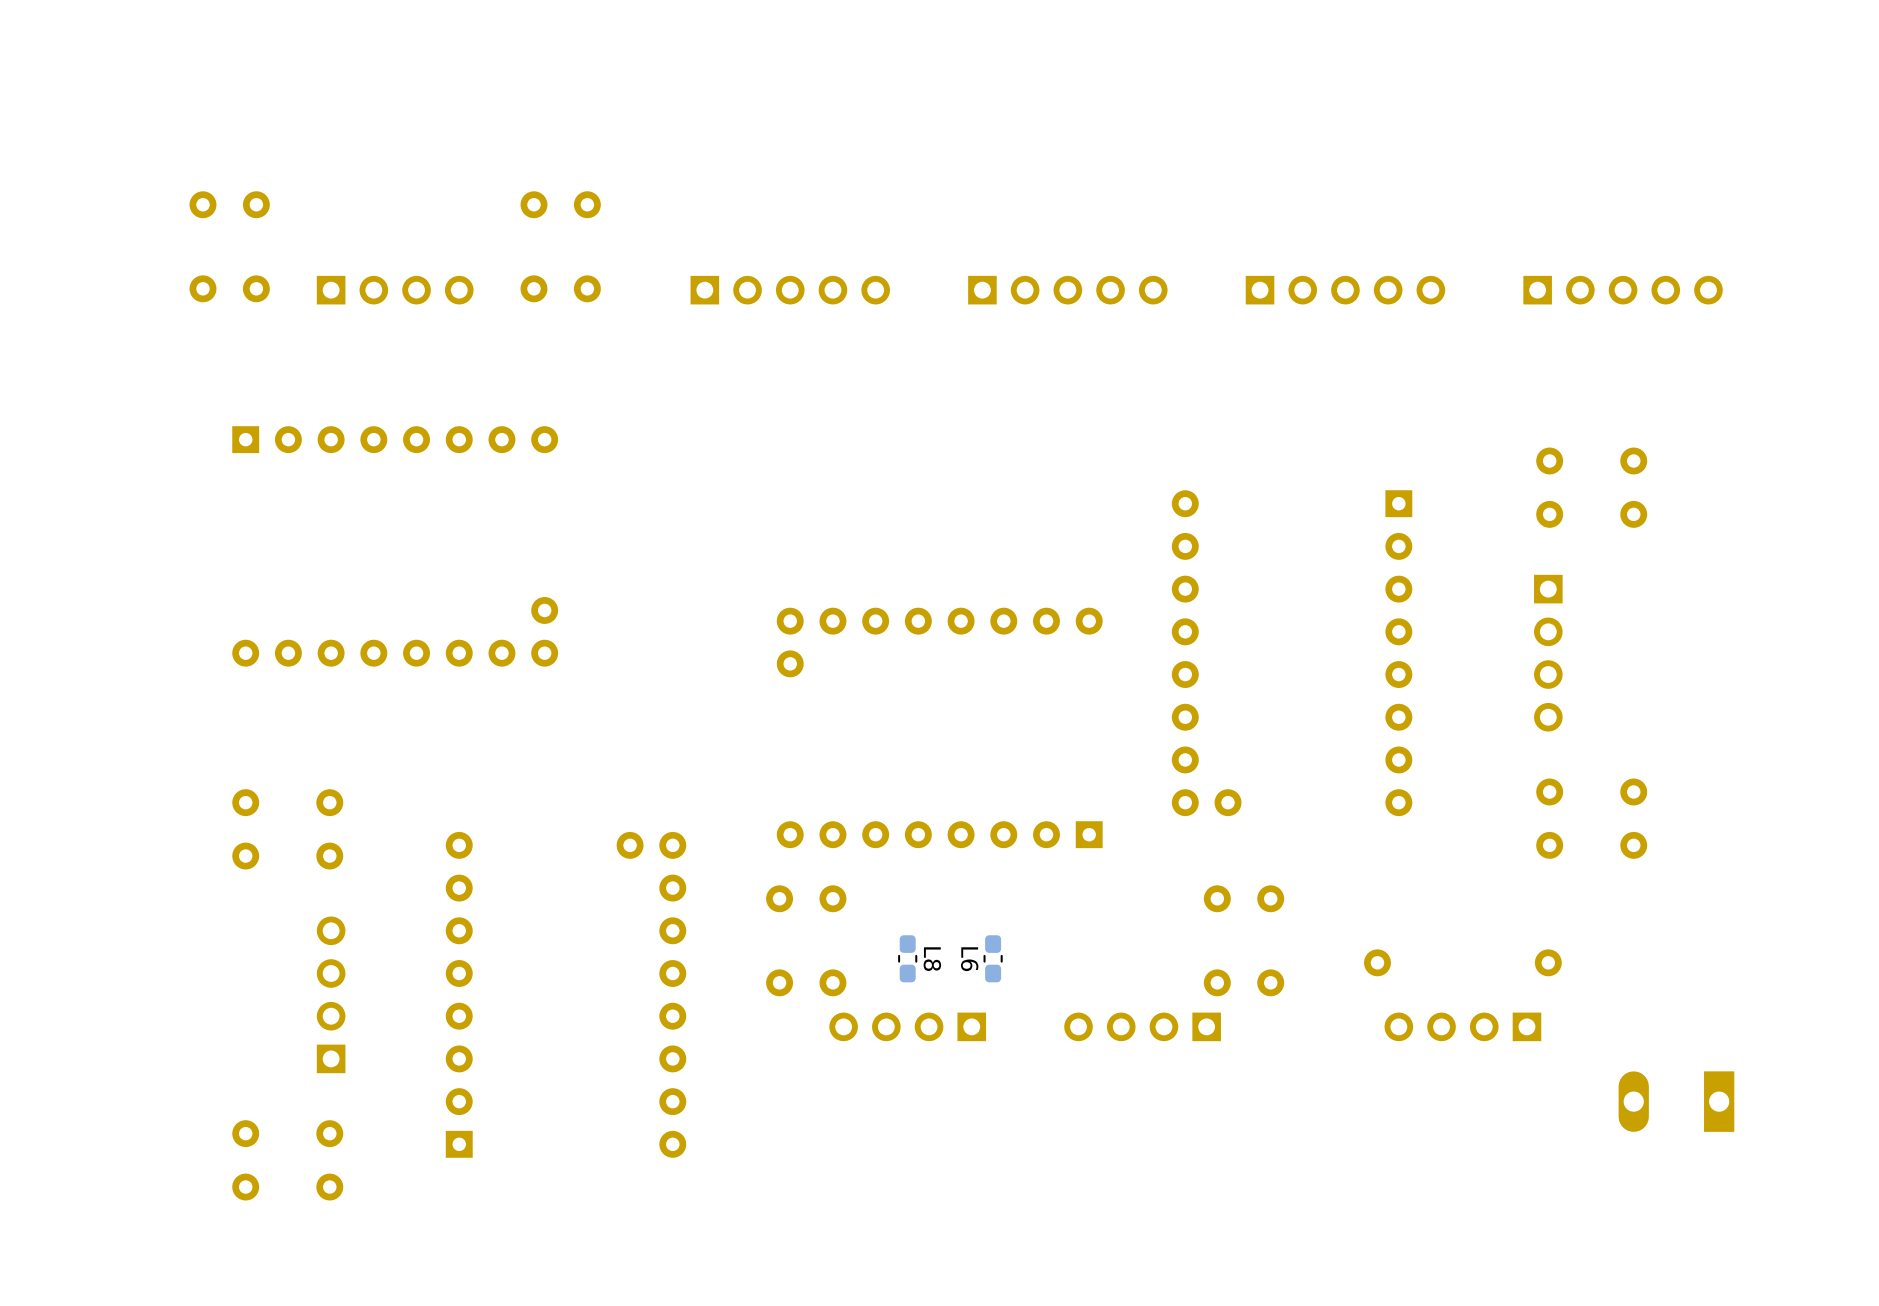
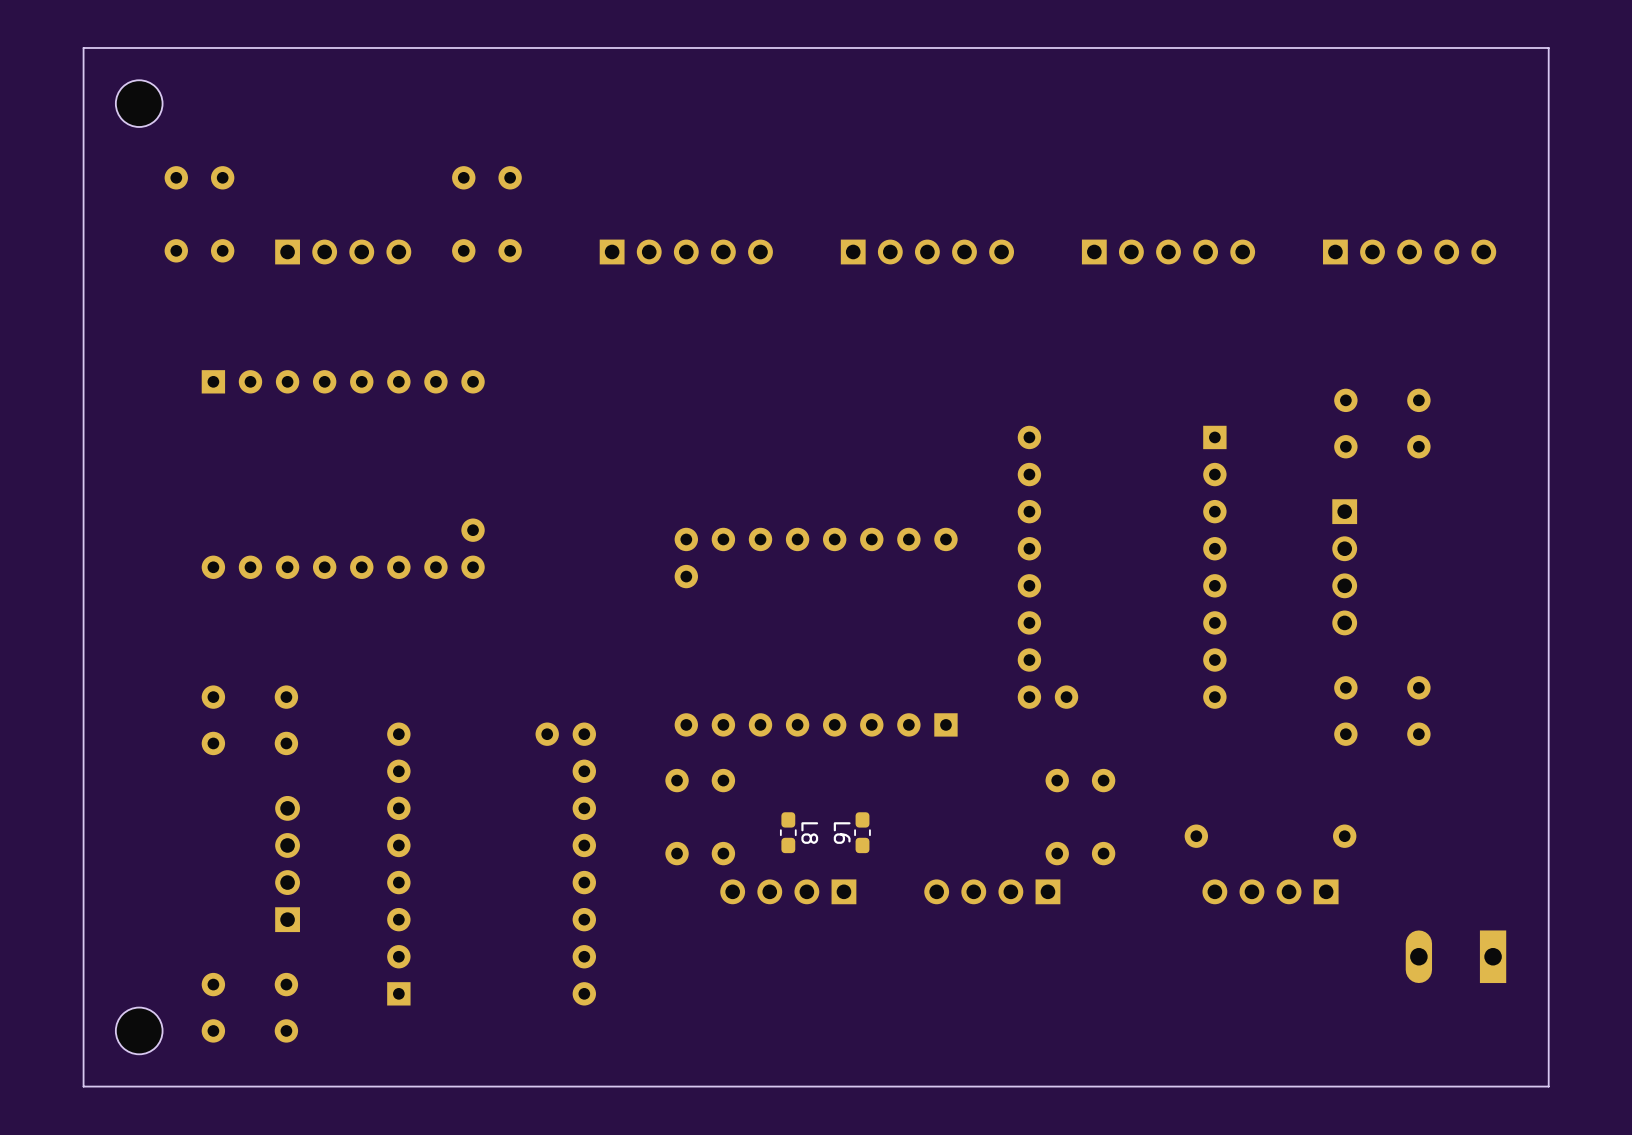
board edge: none -> (1548, 47) (1548, 1086) (83, 1086) (83, 47) (1548, 47)
part: none -> (139, 103)
part: none -> (139, 1030)

